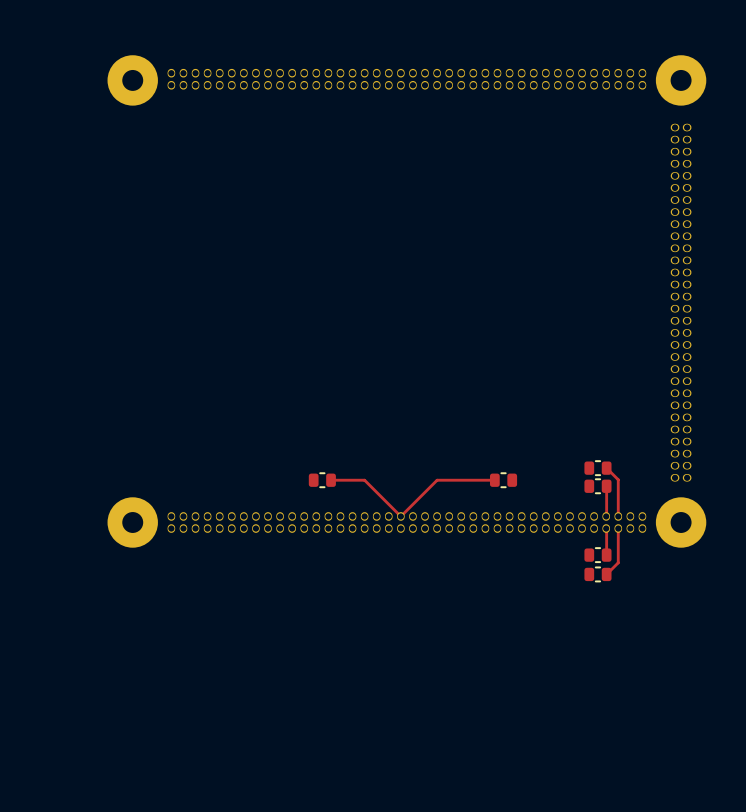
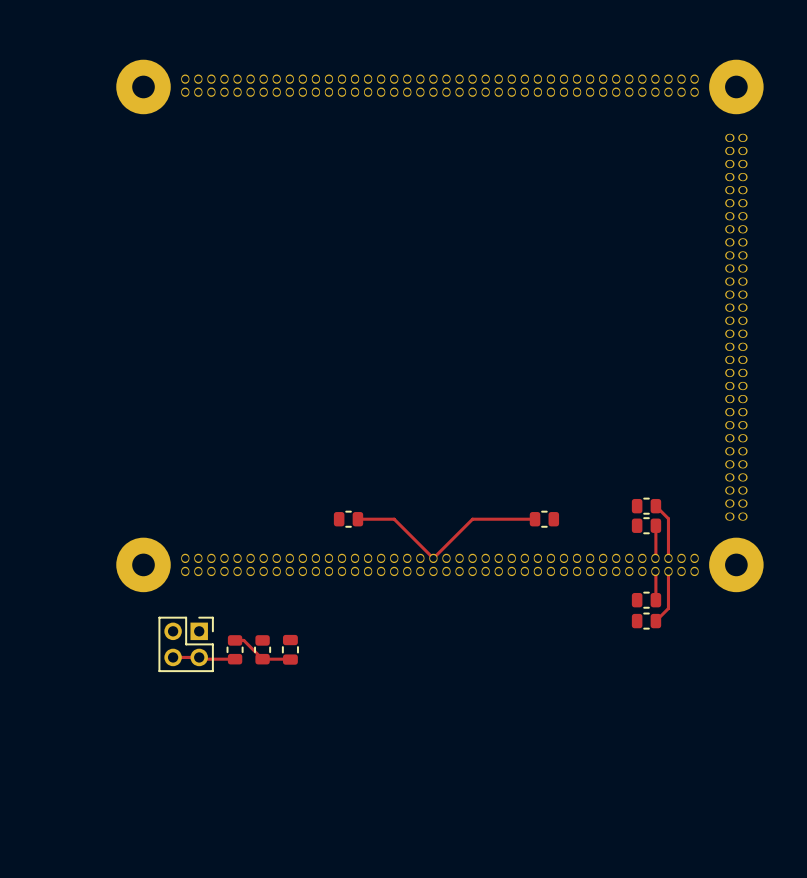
top track: none -> (235, 640) (243, 640) (262, 659) (290, 659)
part: none -> (186, 644)
part: none -> (235, 649)
part: none -> (262, 649)
part: none -> (290, 649)
top track: none -> (173, 657) (235, 659)

